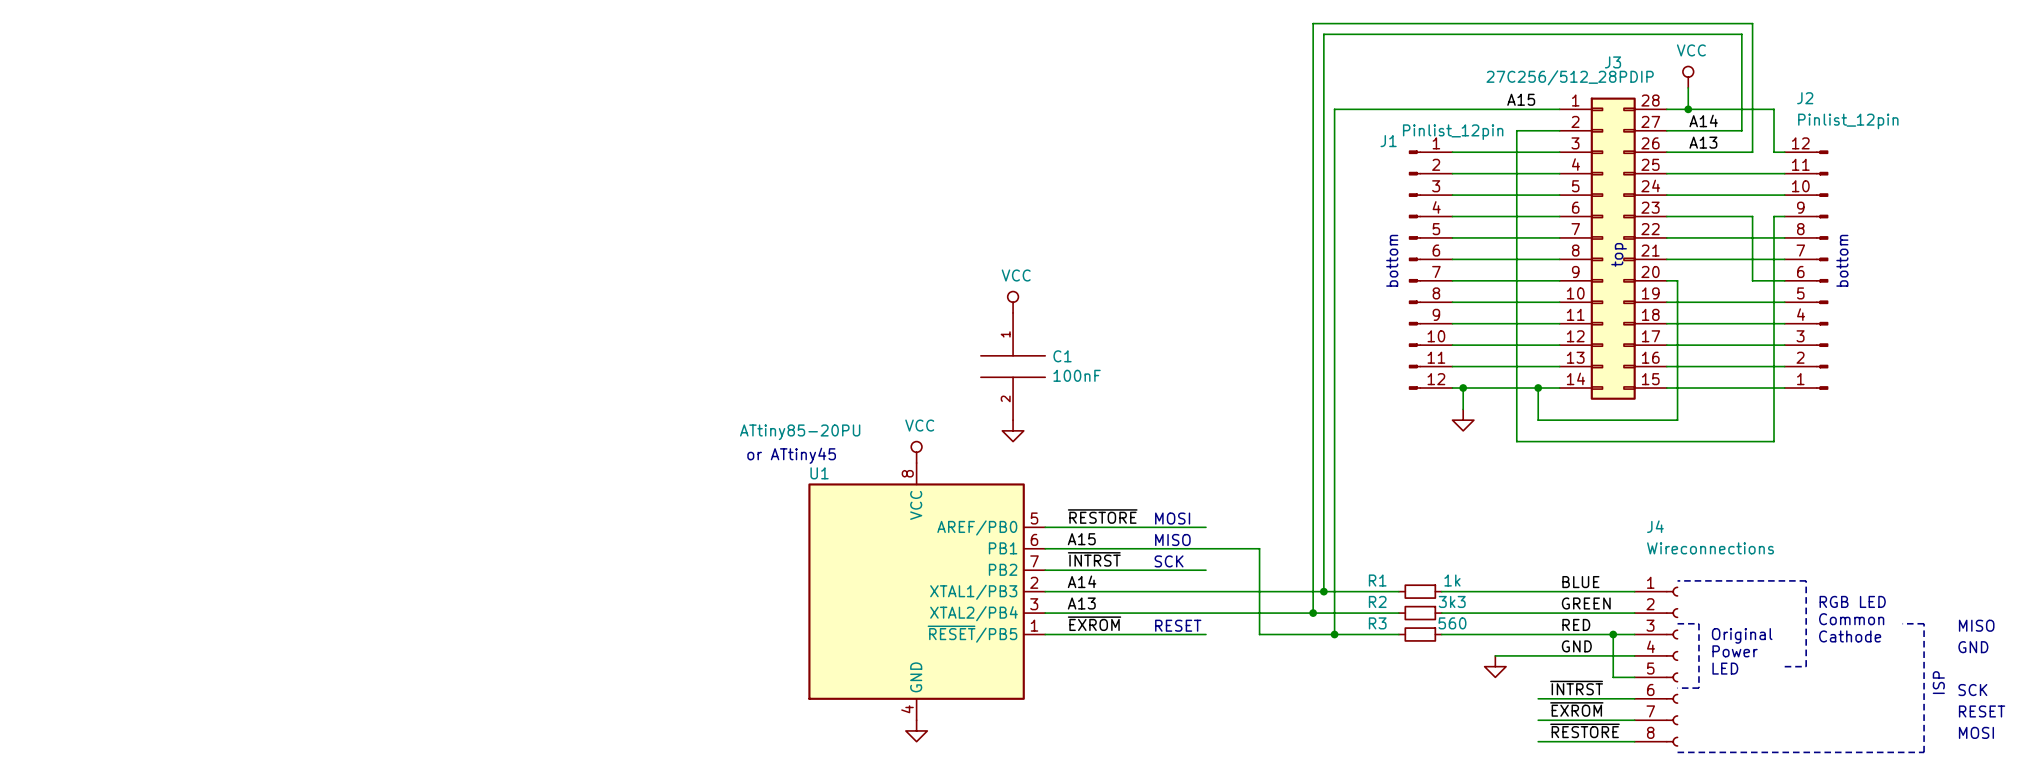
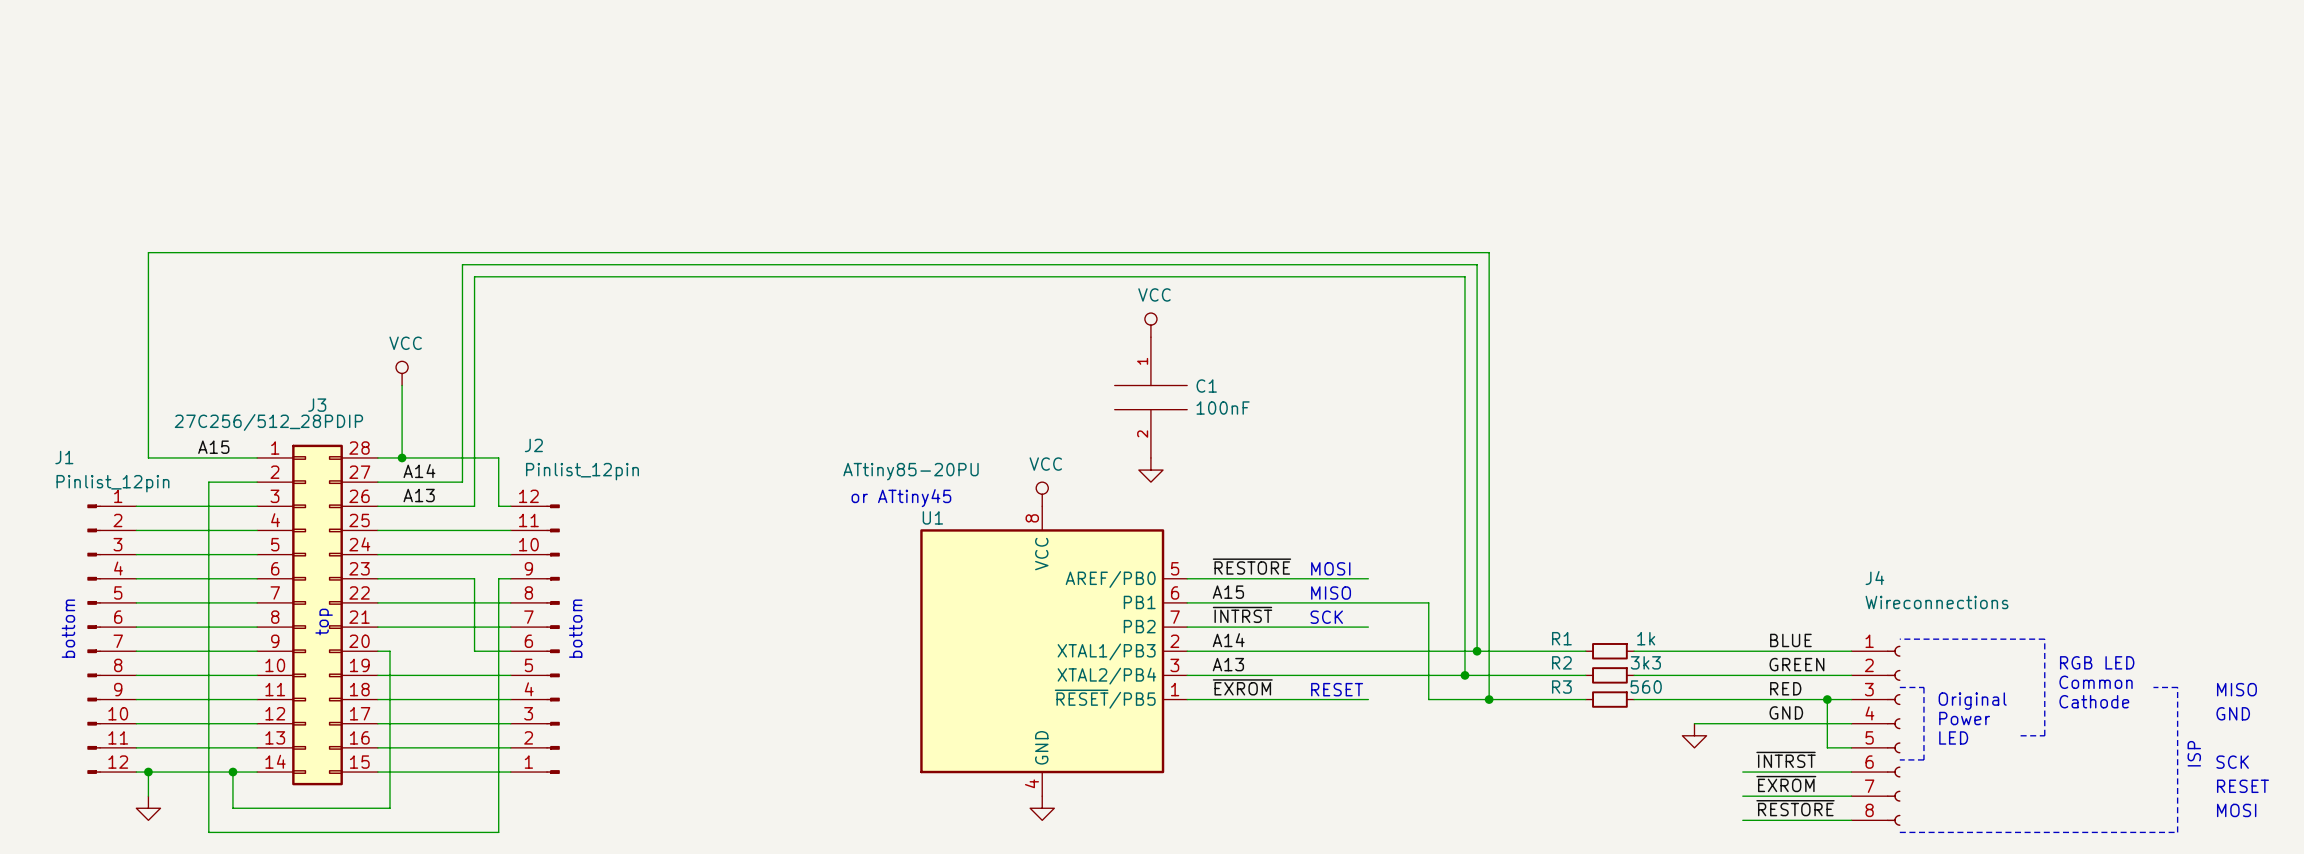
power symbol: VCC (1688, 77) -> none
wire: (1688, 87) (1688, 109) -> none
label: A15 (1521, 99) -> none
wire: (1559, 109) (1334, 109) (1334, 634) -> none
wire: (1666, 109) (1774, 109) (1774, 152) (1784, 152) -> none
junction: (1688, 109) -> none
label: A14 (1703, 120) -> none
wire: (1559, 130) (1516, 130) (1516, 441) (1774, 441) (1774, 216) (1784, 216) -> none
wire: (1666, 130) (1741, 130) (1741, 34) (1323, 34) (1323, 591) -> none
J1 value position: Pinlist_12pin (1453, 132) -> Pinlist_12pin (112, 483)
J1 name position: J1 (1388, 141) -> J1 (64, 457)
label: A13 (1703, 142) -> none
wire: (1452, 152) (1559, 152) -> none
wire: (1666, 152) (1752, 152) (1752, 23) (1313, 23) (1313, 237) -> (257, 457) (148, 457) (148, 252) (1489, 252)
wire: (1452, 173) (1559, 173) -> none
wire: (1666, 173) (1784, 173) -> none
wire: (1452, 195) (1559, 195) -> none
wire: (1666, 195) (1784, 195) -> none
wire: (1452, 216) (1559, 216) -> none
wire: (1666, 216) (1752, 216) (1752, 280) (1784, 280) -> none
wire: (1452, 237) (1559, 237) -> none
wire: (1666, 237) (1784, 237) -> none
J3 position: (1613, 248) -> (317, 615)
text: top (1619, 254) -> none
wire: (1452, 259) (1559, 259) -> none
wire: (1666, 259) (1784, 259) -> none
text: bottom (1392, 260) -> none
text: bottom (1842, 260) -> none
J1 position: (1430, 270) -> (111, 639)
J2 position: (1806, 270) -> (535, 639)
wire: (1452, 280) (1559, 280) -> none
wire: (1666, 280) (1677, 280) (1677, 420) (1538, 420) (1538, 388) -> none
wire: (1452, 302) (1559, 302) -> none
wire: (1666, 302) (1784, 302) -> none
wire: (1452, 323) (1559, 323) -> none
wire: (1666, 323) (1784, 323) -> none
power symbol: none -> VCC (402, 373)
wire: (1452, 345) (1559, 345) -> none
wire: (1666, 345) (1784, 345) -> none
wire: none -> (402, 385) (402, 457)
wire: (1452, 366) (1559, 366) -> none
wire: (1666, 366) (1784, 366) -> none
wire: (1452, 388) (1559, 388) -> none
wire: (1463, 388) (1463, 409) -> none
junction: (1463, 388) -> none
junction: (1538, 388) -> none
wire: (1666, 388) (1784, 388) -> none
label: none -> A15 (213, 447)
wire: none -> (377, 457) (498, 457) (498, 506) (510, 506)
junction: none -> (402, 457)
power symbol: (1463, 420) -> none
label: none -> A14 (419, 471)
wire: none -> (257, 482) (208, 482) (208, 832) (498, 832) (498, 578) (510, 578)
wire: none -> (377, 482) (462, 482) (462, 264) (1477, 264) (1477, 651)
label: none -> A13 (419, 495)
wire: none -> (136, 506) (257, 506)
wire: none -> (377, 506) (474, 506) (474, 276) (1464, 276) (1464, 675)
wire: none -> (136, 530) (257, 530)
wire: none -> (377, 530) (510, 530)
wire: none -> (136, 554) (257, 554)
wire: none -> (377, 554) (510, 554)
wire: none -> (136, 578) (257, 578)
wire: none -> (377, 578) (474, 578) (474, 651) (510, 651)
wire: none -> (136, 602) (257, 602)
wire: none -> (377, 602) (510, 602)
text: none -> top (324, 622)
wire: none -> (136, 627) (257, 627)
wire: none -> (377, 627) (510, 627)
text: none -> bottom (68, 628)
text: none -> bottom (575, 628)
wire: none -> (136, 651) (257, 651)
wire: none -> (377, 651) (389, 651) (389, 808) (232, 808) (232, 772)
junction: none -> (1477, 651)
junction: (1323, 591) -> none
wire: none -> (136, 675) (257, 675)
wire: none -> (377, 675) (510, 675)
junction: none -> (1464, 675)
wire: none -> (1489, 675) (1489, 699)
junction: (1313, 613) -> none
wire: none -> (136, 699) (257, 699)
wire: none -> (377, 699) (510, 699)
junction: none -> (1489, 699)
junction: (1334, 634) -> none
wire: none -> (136, 723) (257, 723)
wire: none -> (377, 723) (510, 723)
wire: none -> (136, 747) (257, 747)
wire: none -> (377, 747) (510, 747)
wire: none -> (136, 772) (257, 772)
wire: none -> (148, 772) (148, 796)
junction: none -> (148, 772)
junction: none -> (232, 772)
wire: none -> (377, 772) (510, 772)
power symbol: none -> (148, 808)

